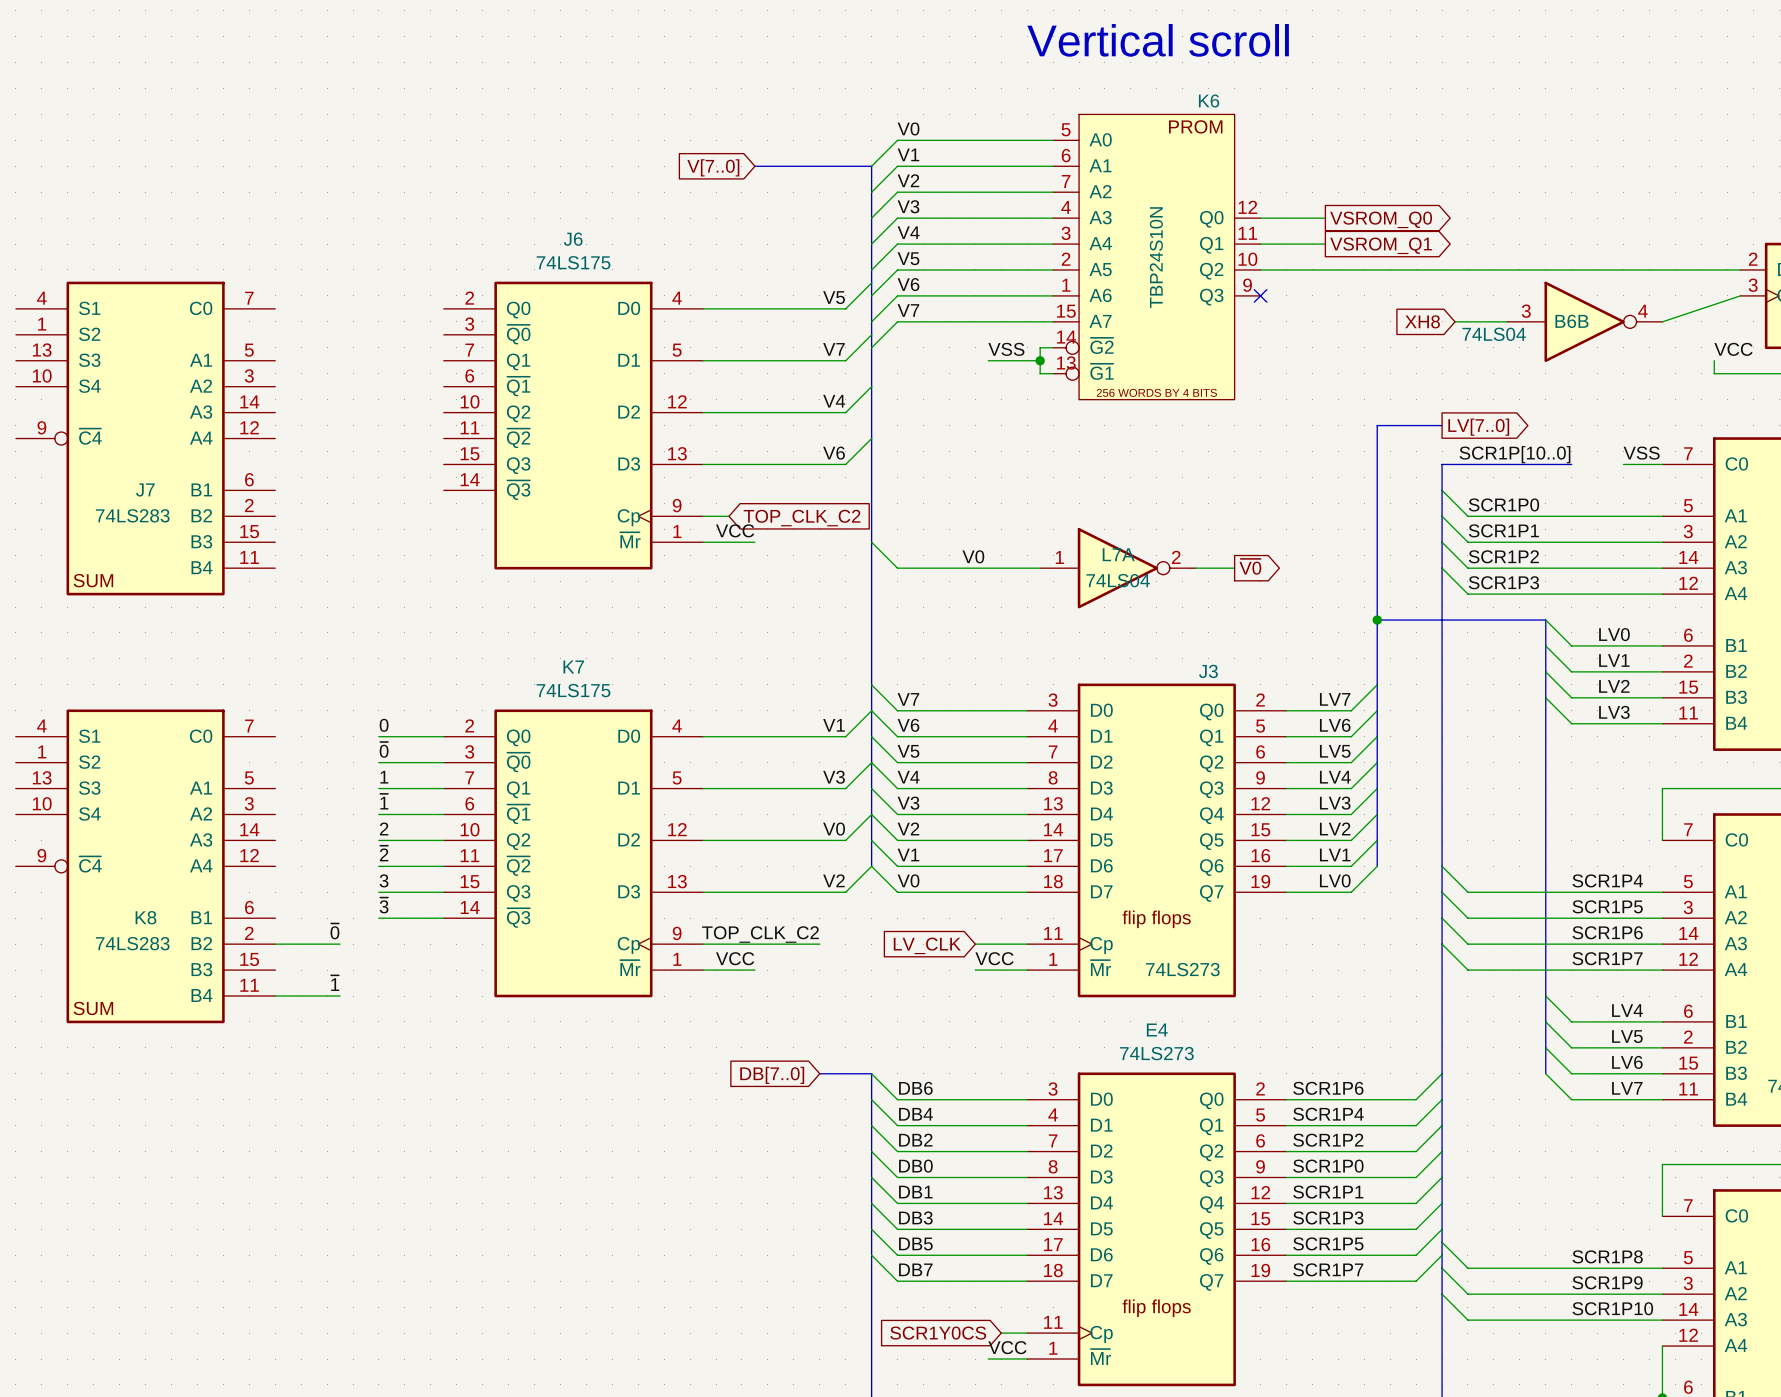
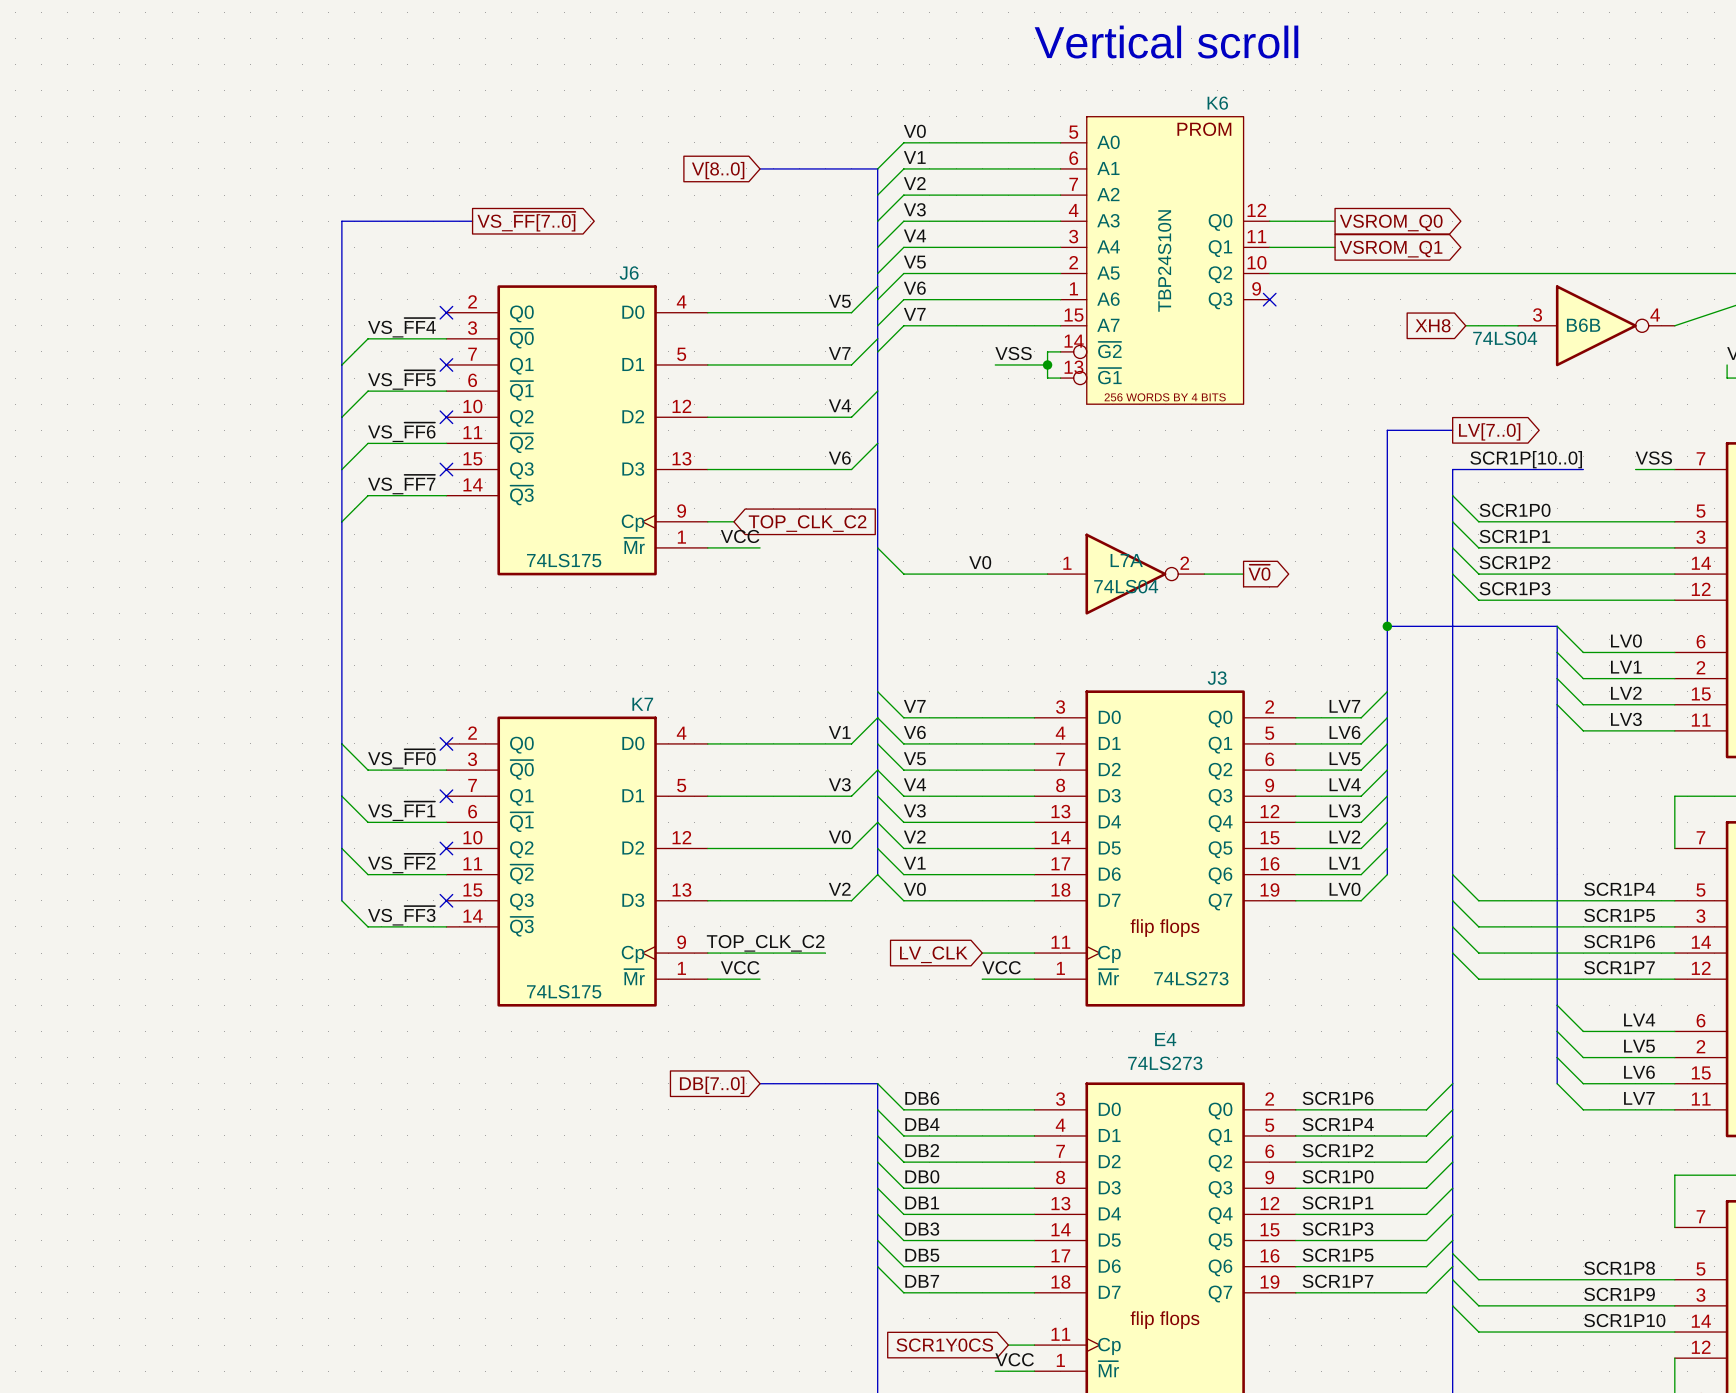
global label: V[7..0] (713, 167) -> V[8..0] (718, 170)
bus: none -> (472, 221) (341, 221) (341, 900)
global label: none -> VS_~{FF[7..0]} (526, 221)
J6 name position: J6 (573, 239) -> J6 (629, 273)
J6 value position: 74LS175 (573, 262) -> 74LS175 (564, 560)
no-connect mark: none -> (446, 312)
label: none -> VS_~{FF4} (401, 327)
wire: none -> (446, 338) (368, 338) (341, 364)
no-connect mark: none -> (446, 364)
label: none -> VS_~{FF5} (401, 380)
wire: none -> (446, 391) (368, 391) (341, 417)
no-connect mark: none -> (446, 417)
label: none -> VS_~{FF6} (401, 432)
J7: 74LS283 (145, 438) -> none
wire: none -> (446, 443) (368, 443) (341, 469)
no-connect mark: none -> (446, 469)
label: none -> VS_~{FF7} (401, 484)
wire: none -> (446, 495) (368, 495) (341, 521)
K7 name position: K7 (573, 666) -> K7 (642, 704)
K7 value position: 74LS175 (573, 690) -> 74LS175 (564, 991)
label: 0 (384, 725) -> none
wire: none -> (341, 743) (368, 770) (381, 770)
wire: (378, 736) (443, 736) -> none
no-connect mark: none -> (446, 743)
label: ~{0} (384, 749) -> VS_~{FF0} (401, 759)
label: 1 (384, 777) -> none
wire: none -> (341, 796) (368, 822) (381, 822)
wire: (378, 788) (443, 788) -> none
no-connect mark: none -> (446, 796)
label: ~{1} (384, 801) -> VS_~{FF1} (401, 811)
label: 2 (384, 828) -> none
wire: none -> (341, 848) (368, 874) (381, 874)
wire: (378, 840) (443, 840) -> none
no-connect mark: none -> (446, 848)
label: ~{2} (384, 853) -> VS_~{FF2} (401, 863)
K8: 74LS283 (145, 866) -> none
label: 3 (384, 880) -> none
wire: none -> (341, 900) (368, 926) (381, 926)
wire: (378, 892) (443, 892) -> none
no-connect mark: none -> (446, 900)
label: ~{3} (384, 905) -> VS_~{FF3} (401, 915)
label: ~{0} (334, 931) -> none
wire: (275, 944) (340, 944) -> none
label: ~{1} (335, 983) -> none
wire: (275, 996) (340, 996) -> none
bus: none -> (760, 1083) (825, 1083)
global label position: DB[7..0] (772, 1075) -> DB[7..0] (712, 1085)

